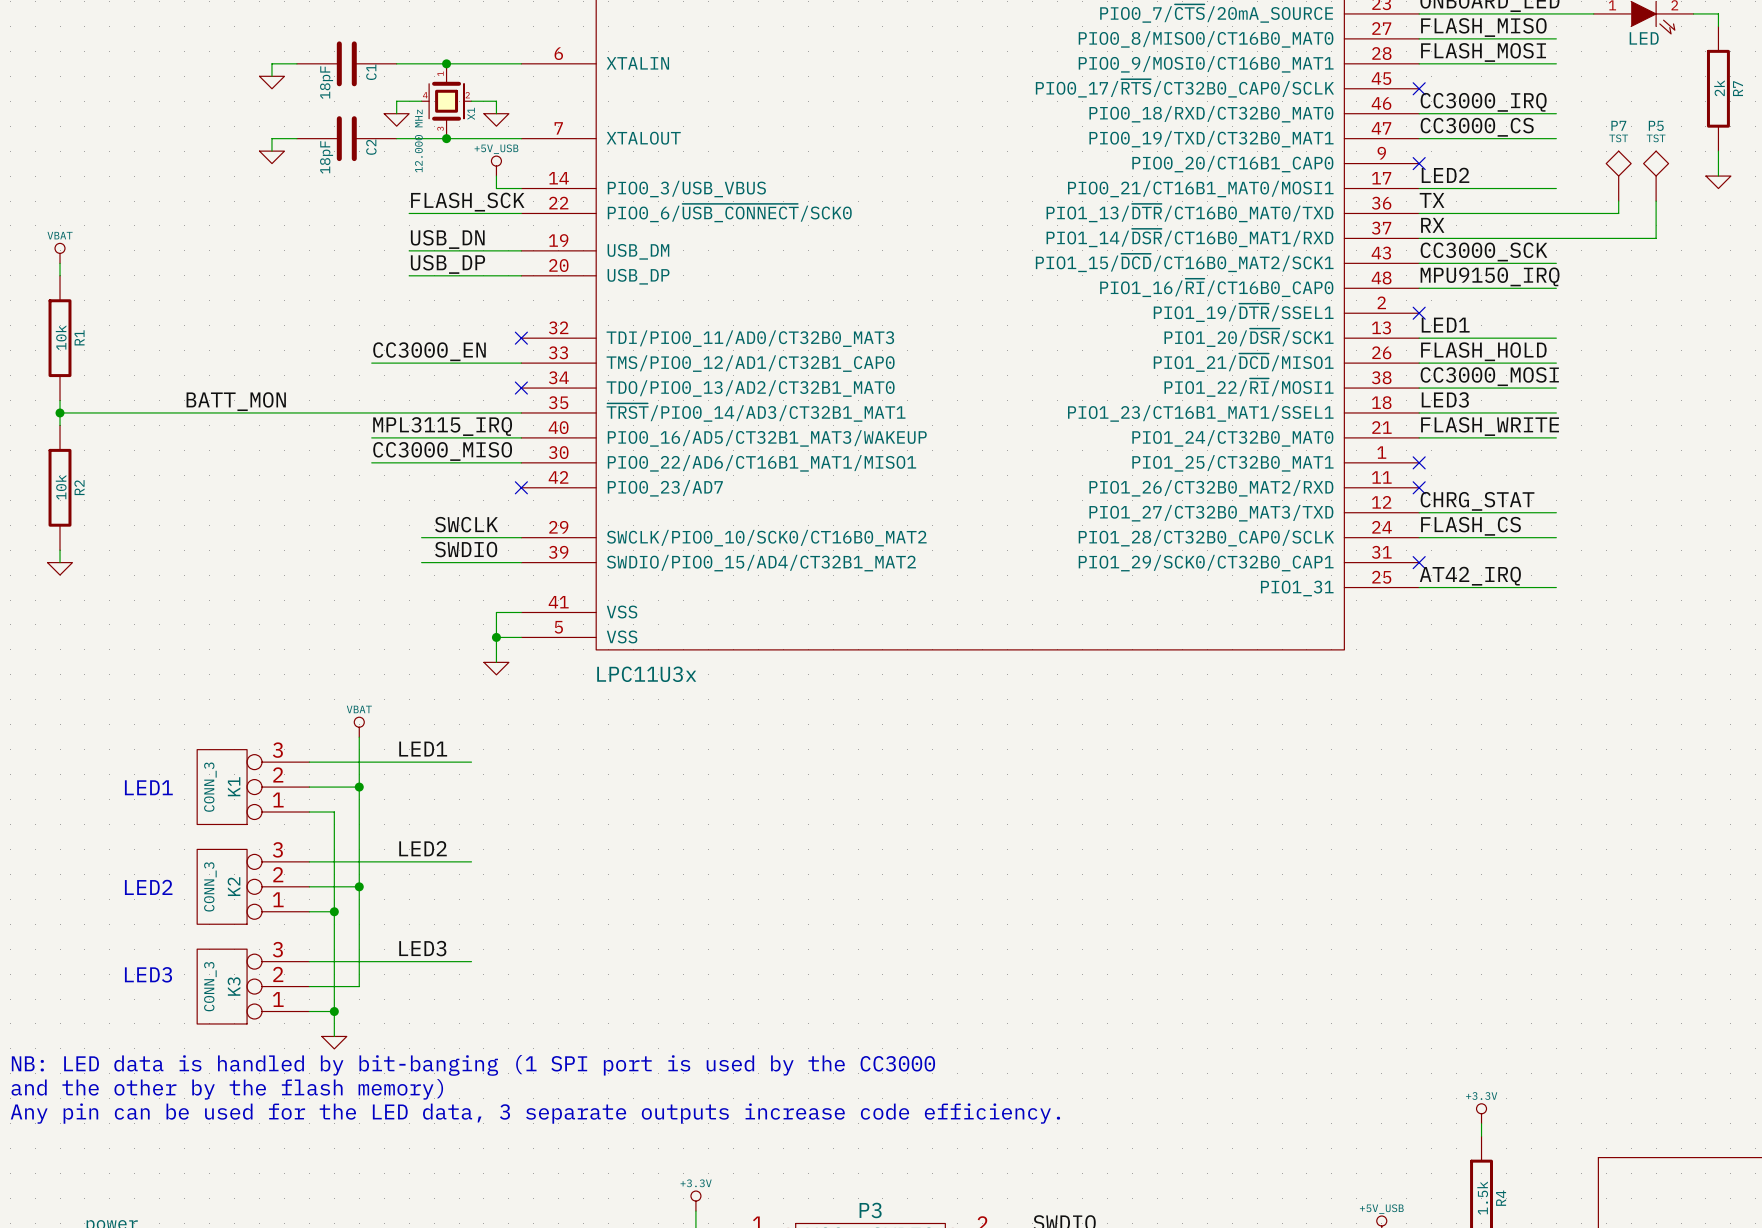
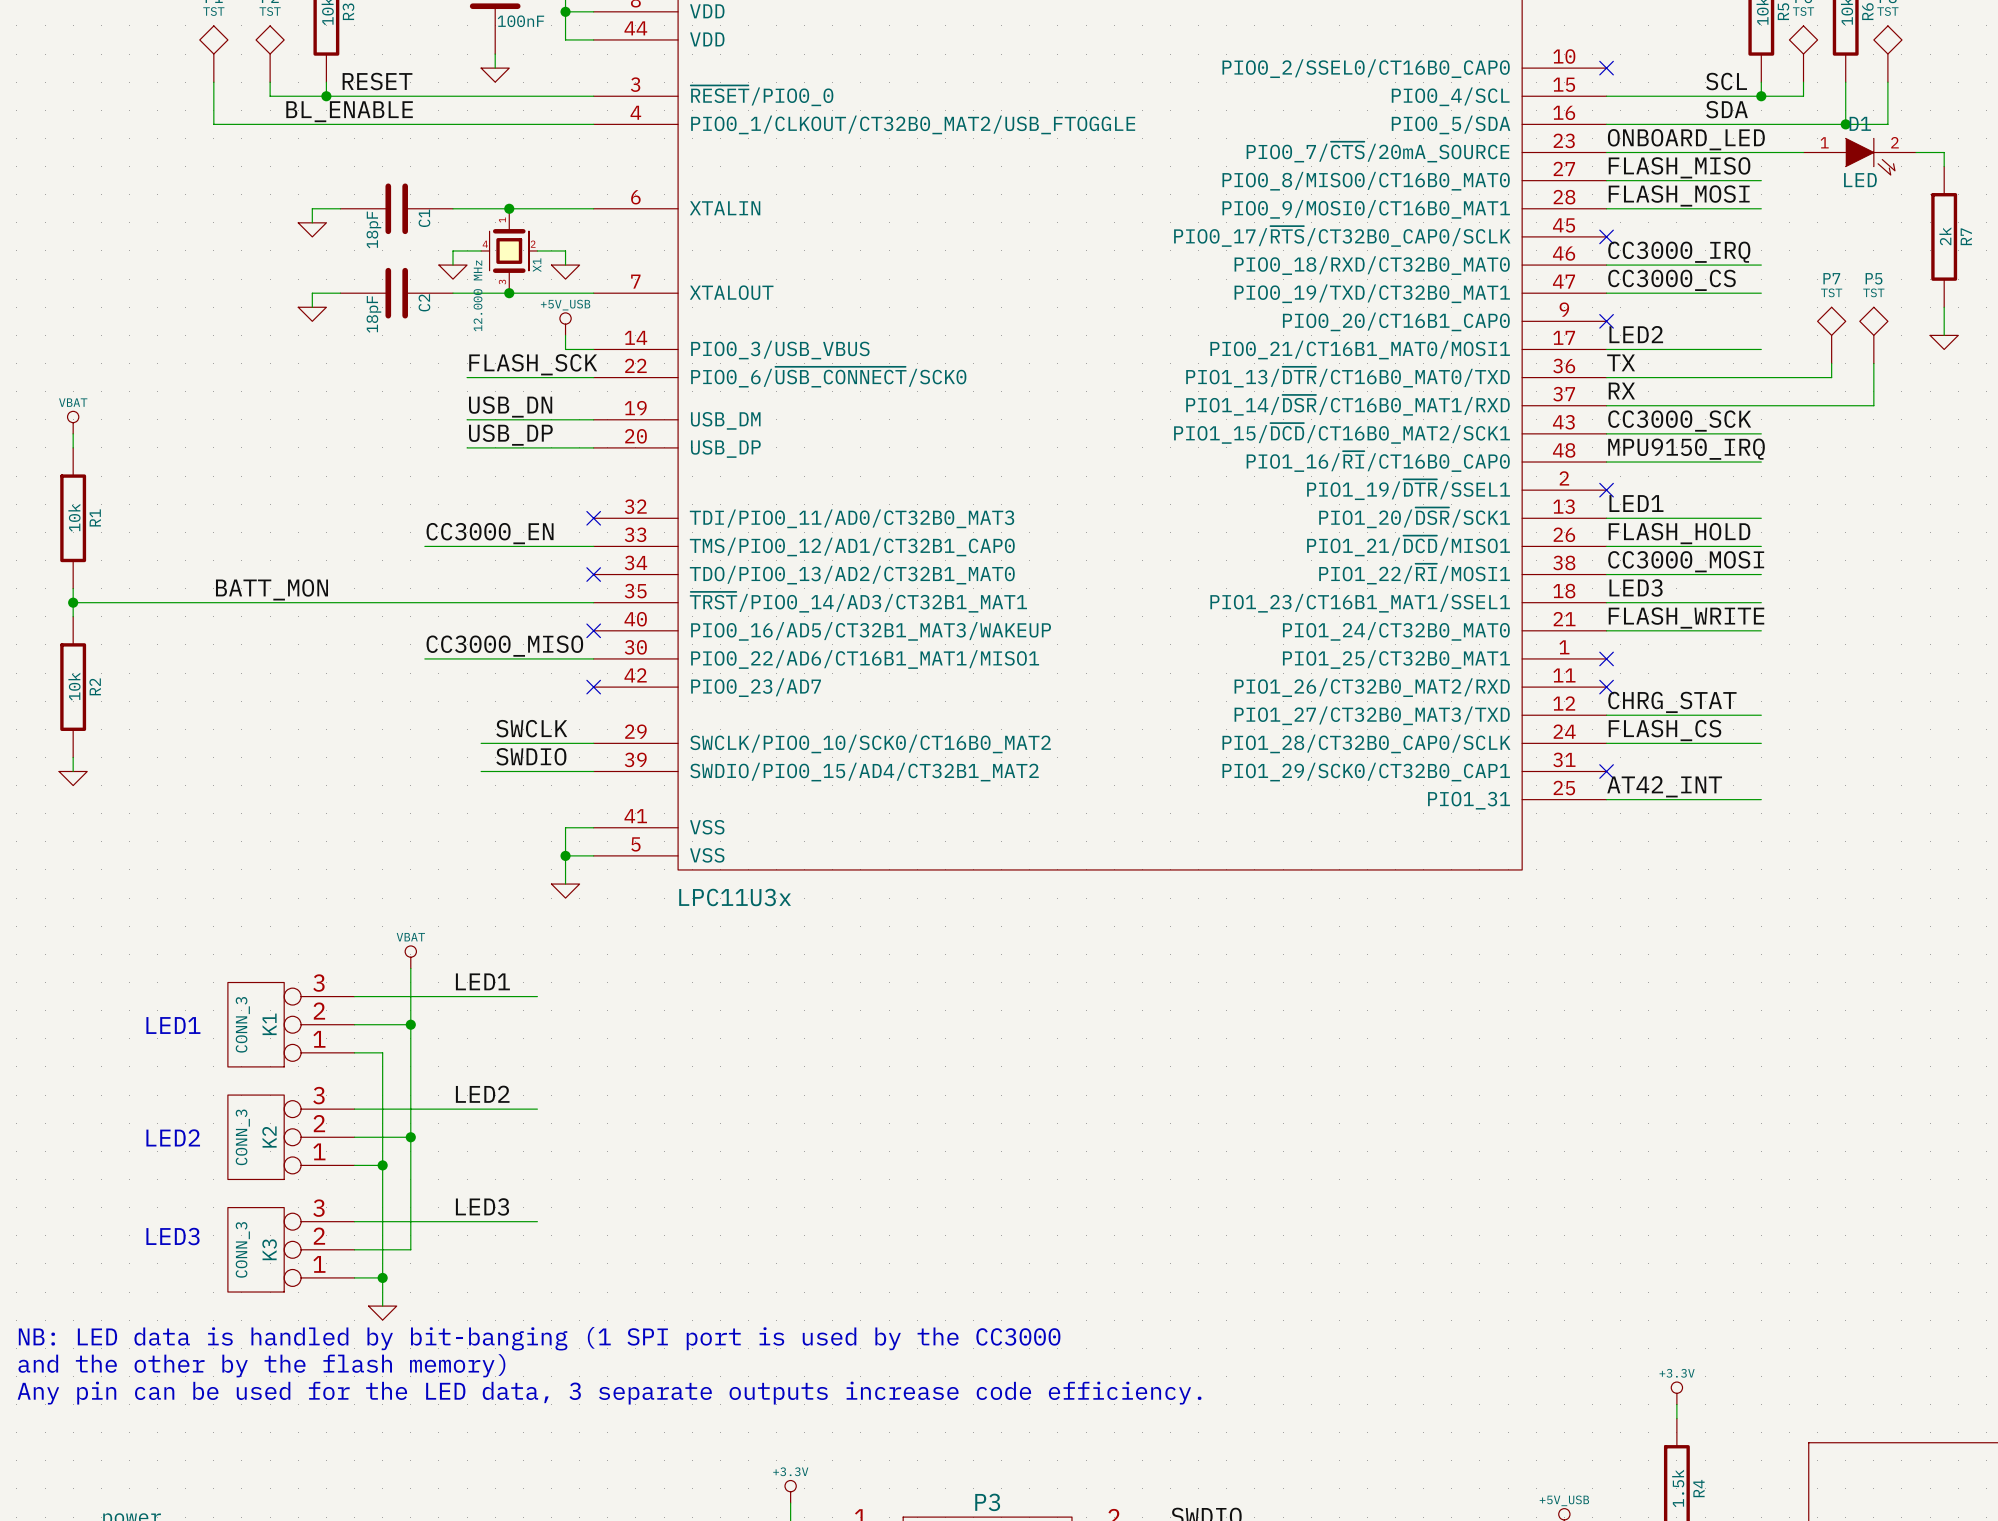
label: MPL3115_IRQ (442, 426) -> none
wire: (371, 437) (521, 437) -> none
no-connect mark: none -> (593, 630)
label: AT42_IRQ (1470, 576) -> AT42_INT (1664, 786)

